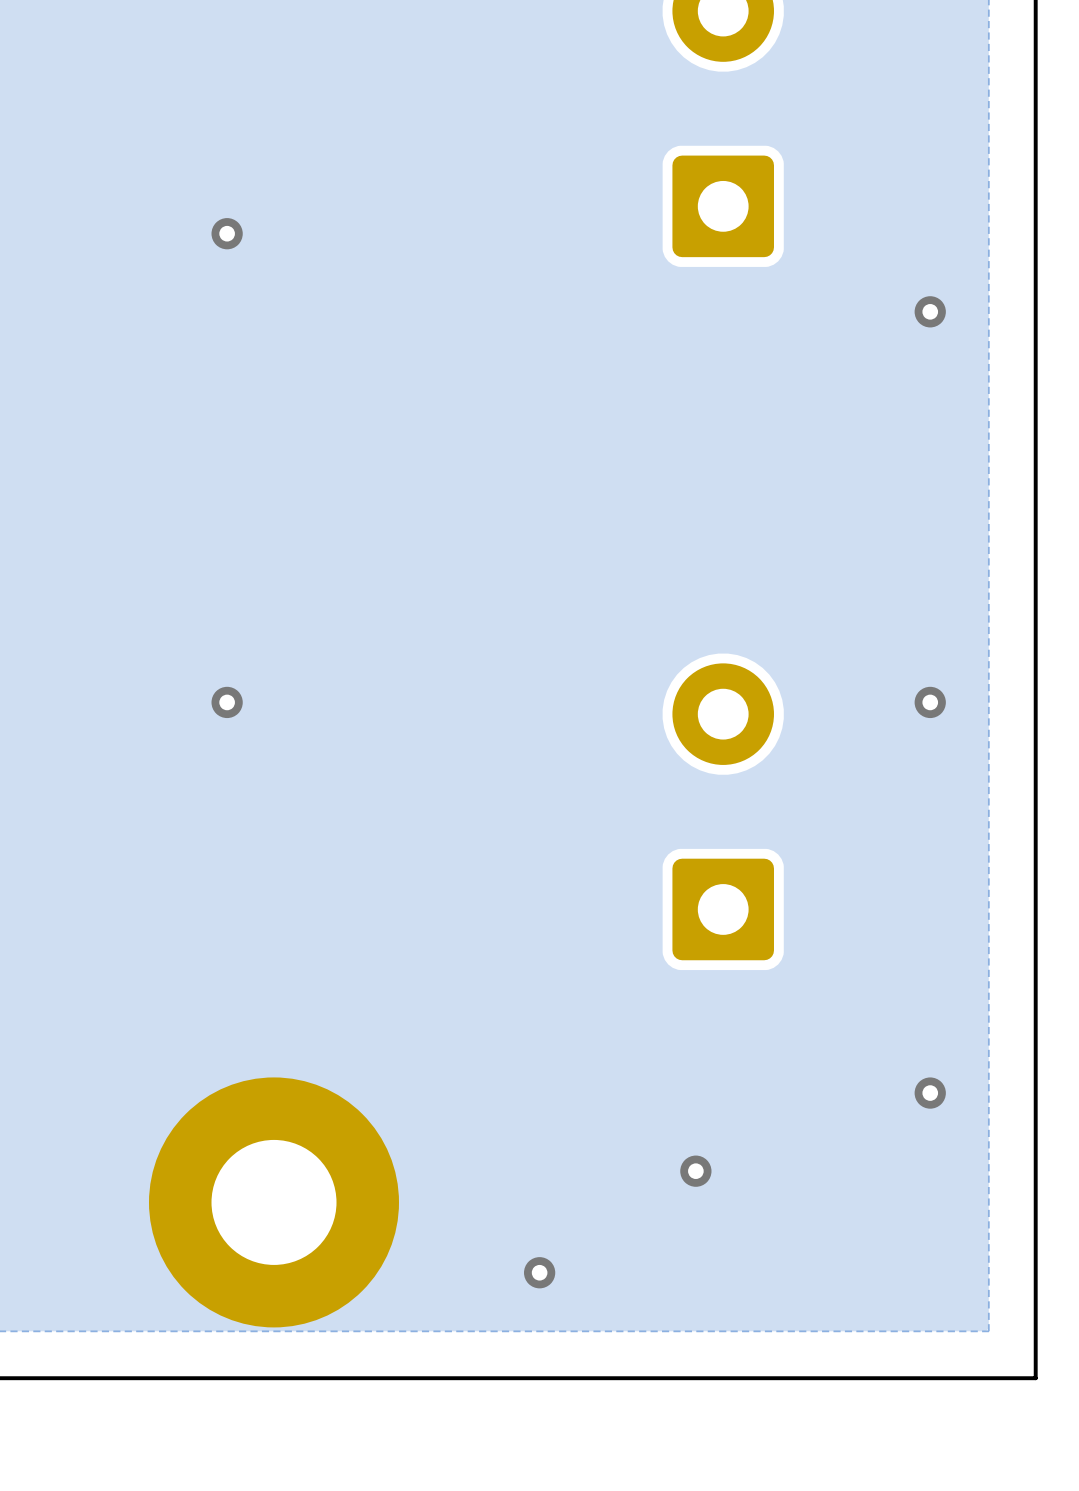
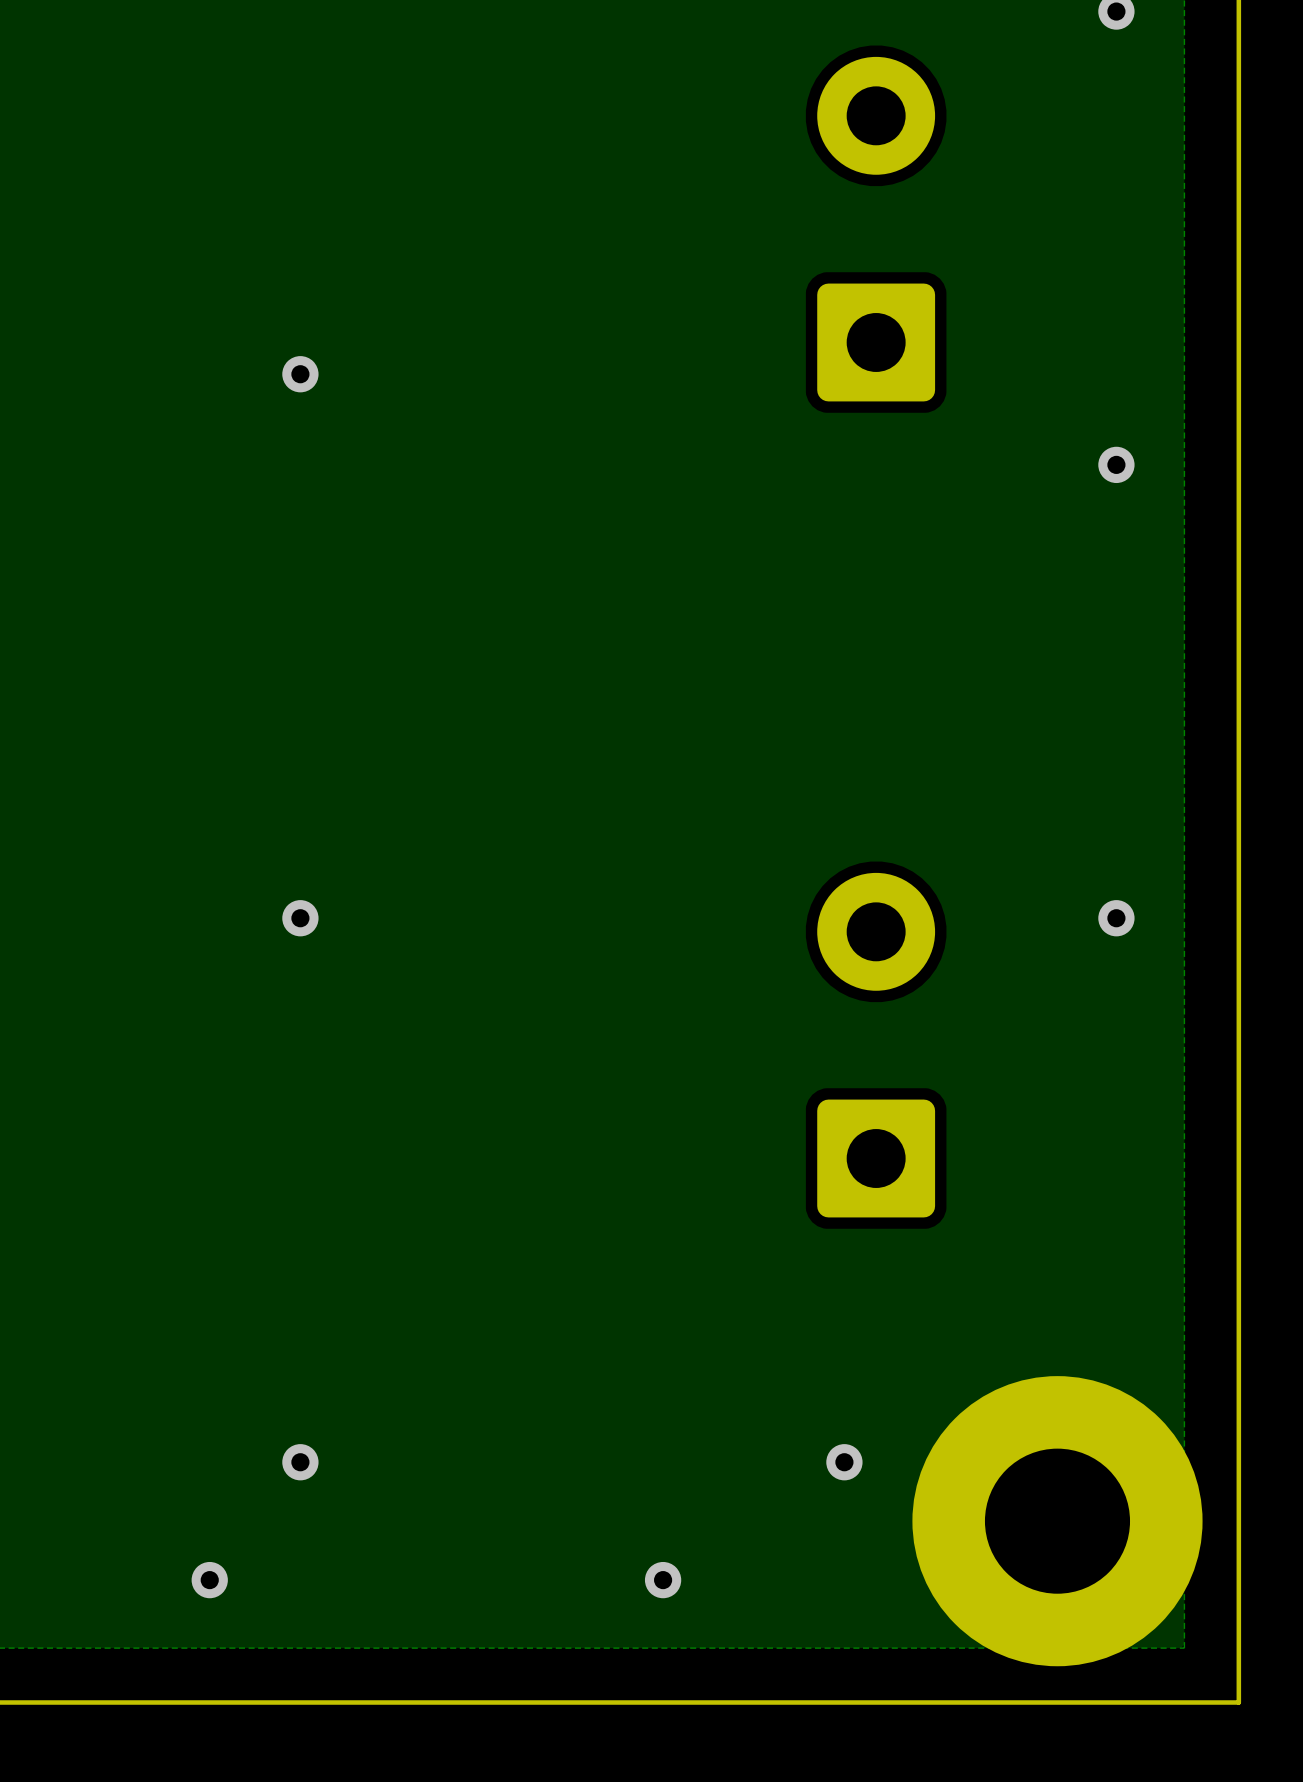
via: (930, 1093) -> none
via: none -> (300, 1462)
part position: (274, 1202) -> (1057, 1521)
via: none -> (209, 1580)

